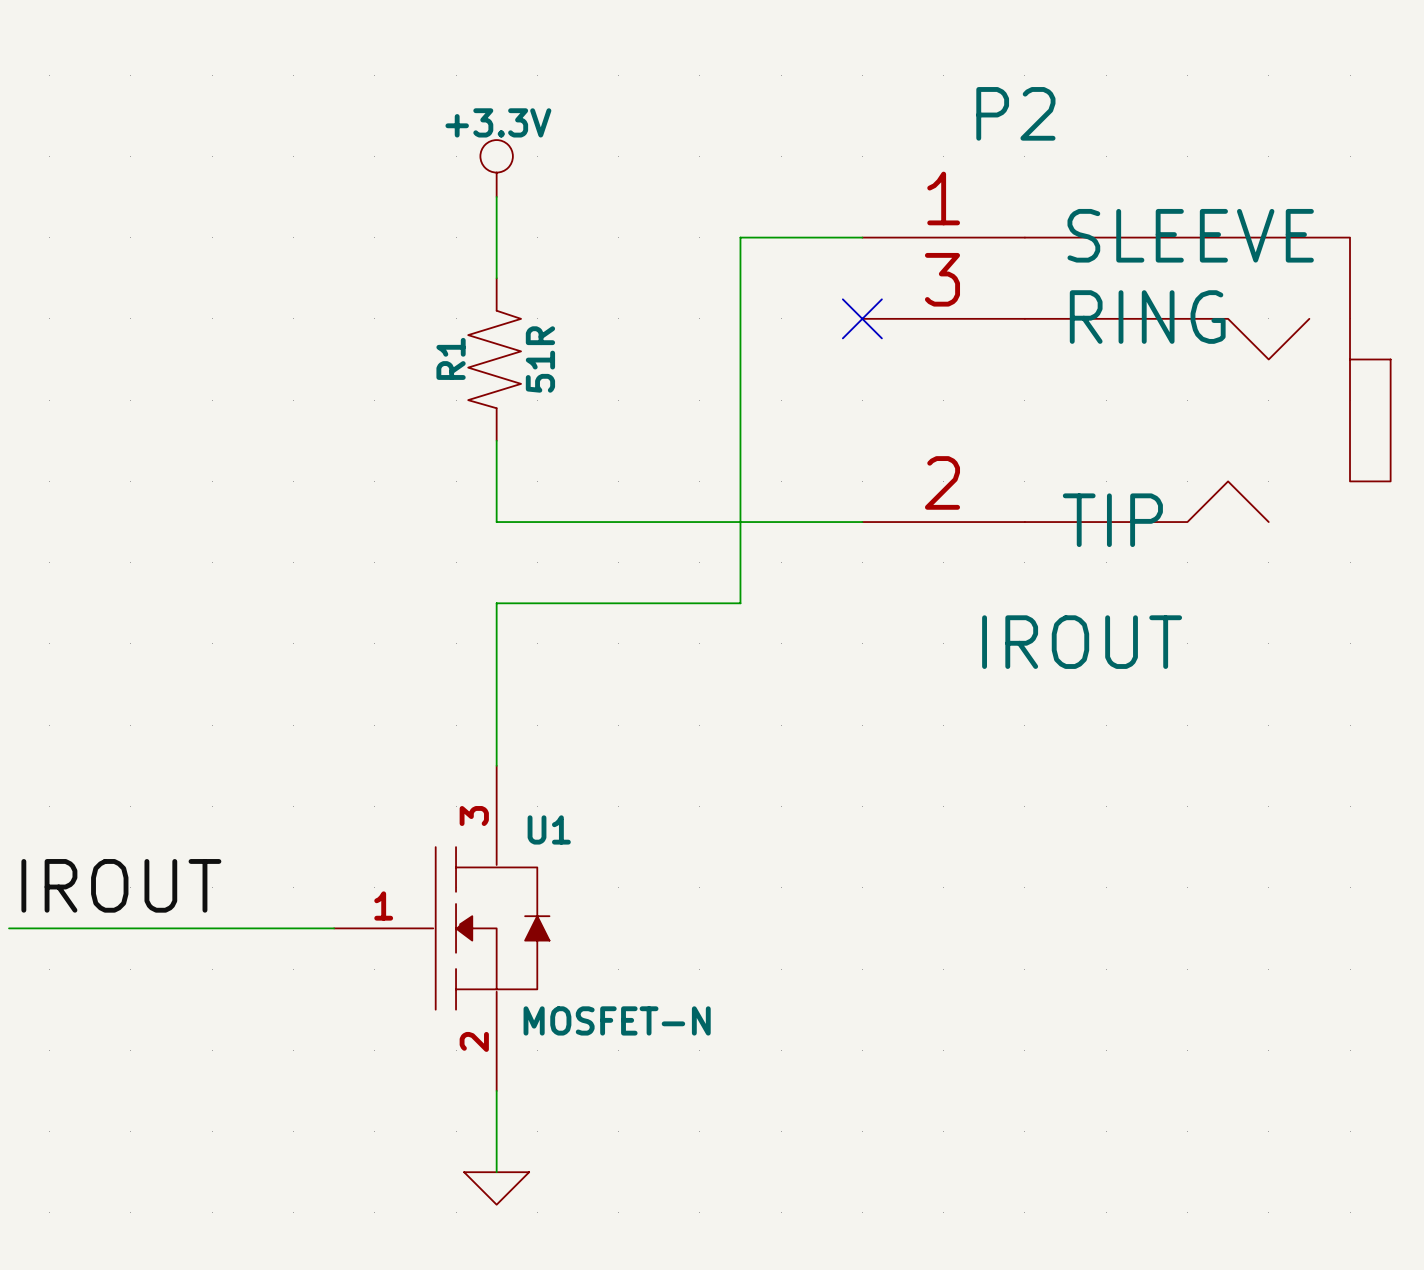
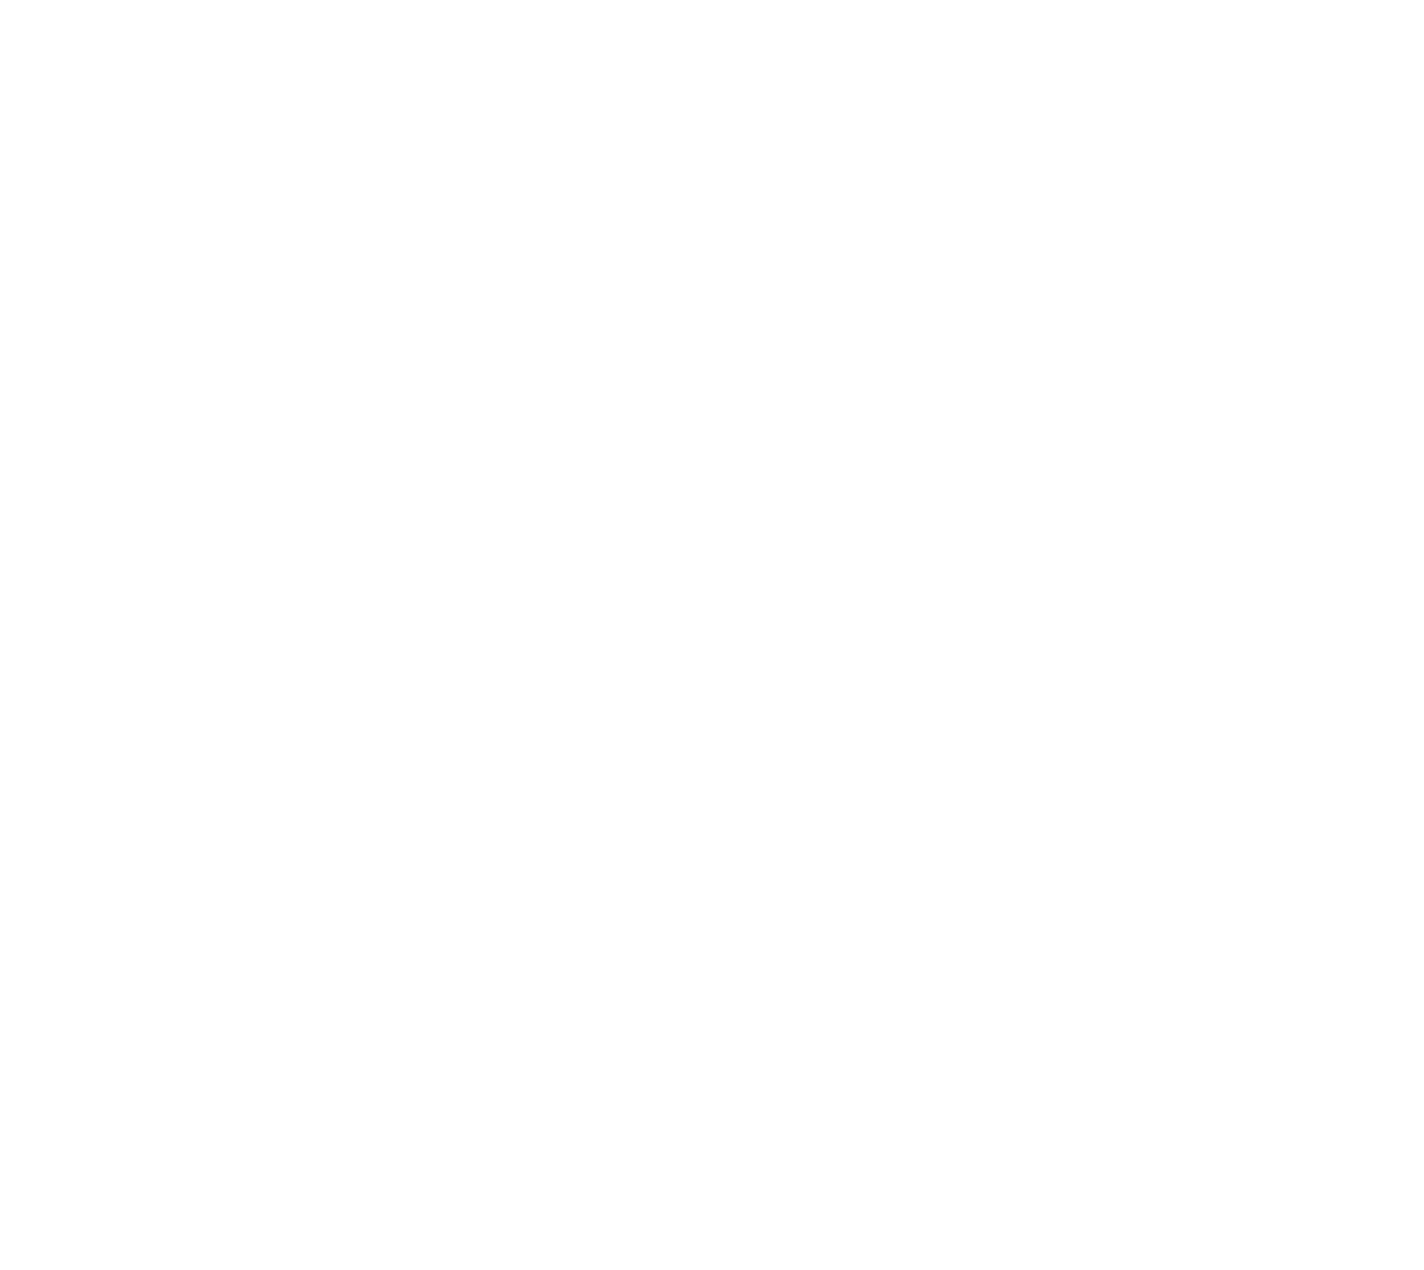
power symbol: +3.3V (496, 168) -> none
wire: (496, 196) (496, 278) -> none
wire: (862, 237) (740, 237) (740, 603) (496, 603) (496, 765) -> none
no-connect mark: (862, 318) -> none
R1: 51R (494, 359) -> none
P2: IROUT (1126, 379) -> none
wire: (496, 440) (496, 522) (862, 522) -> none
label: IROUT (121, 885) -> none
wire: (9, 928) (334, 928) -> none
U1: MOSFET-N (441, 928) -> none
wire: (496, 1090) (496, 1172) -> none
power symbol: (496, 1188) -> none

